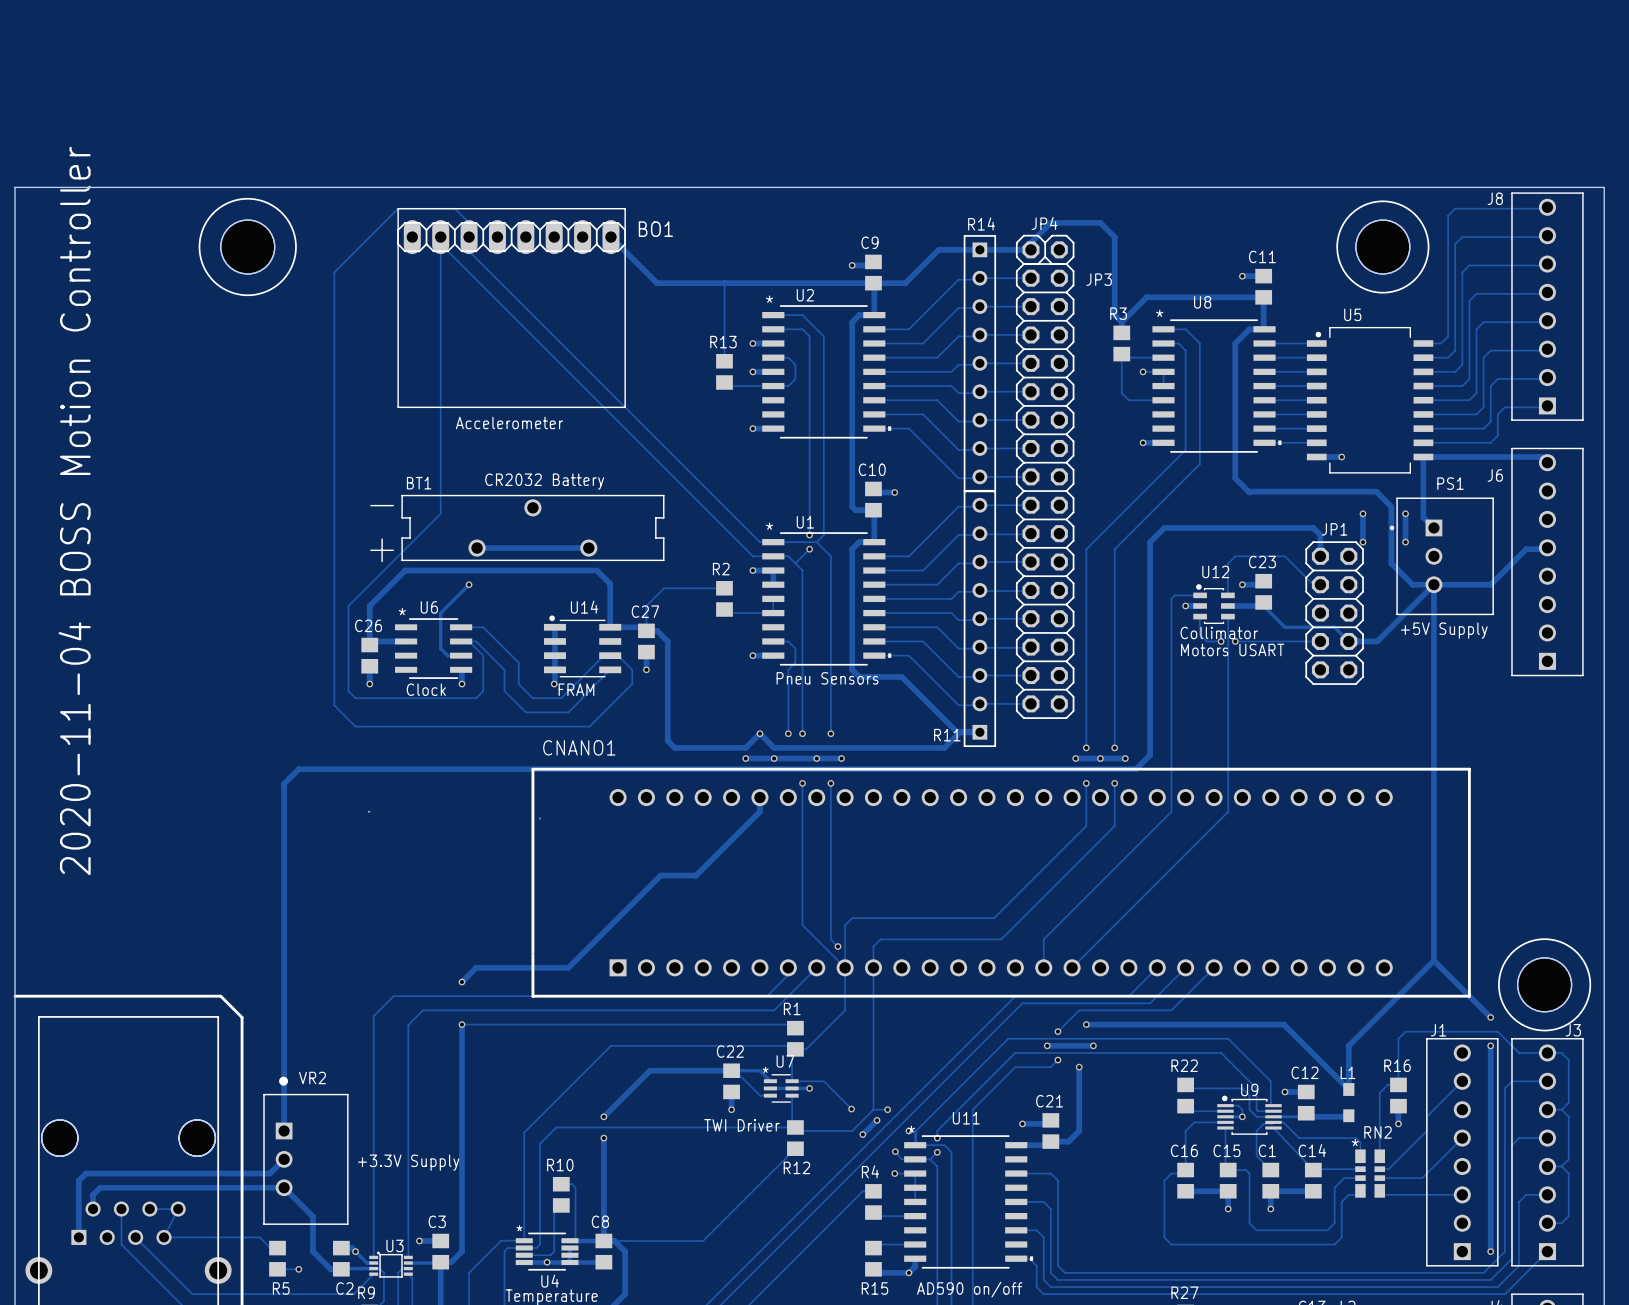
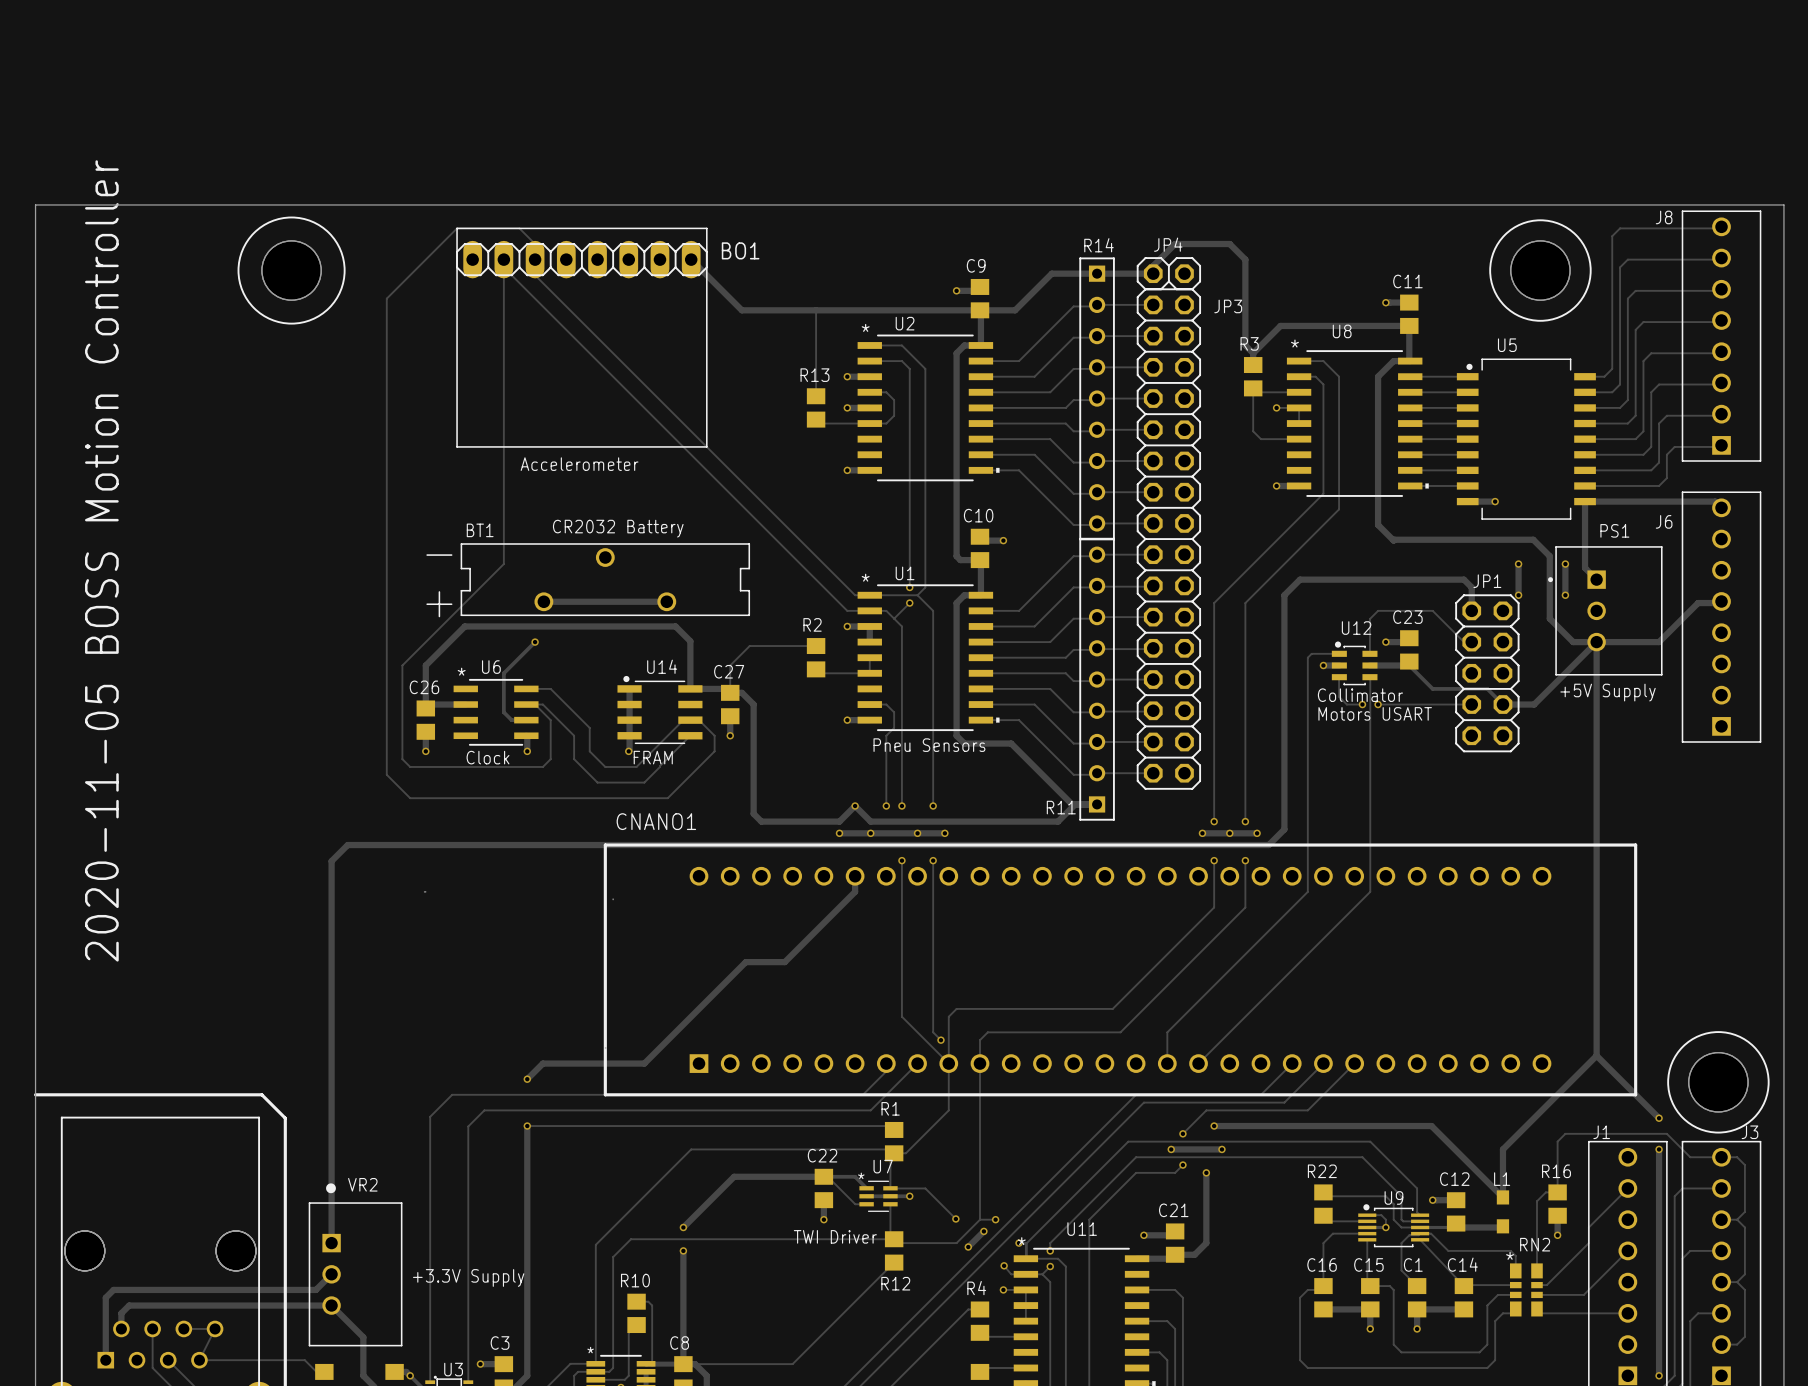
text: 2020-11-04 BOSS Motion Controller (74, 510) -> 2020-11-05 BOSS Motion Controller (101, 560)

